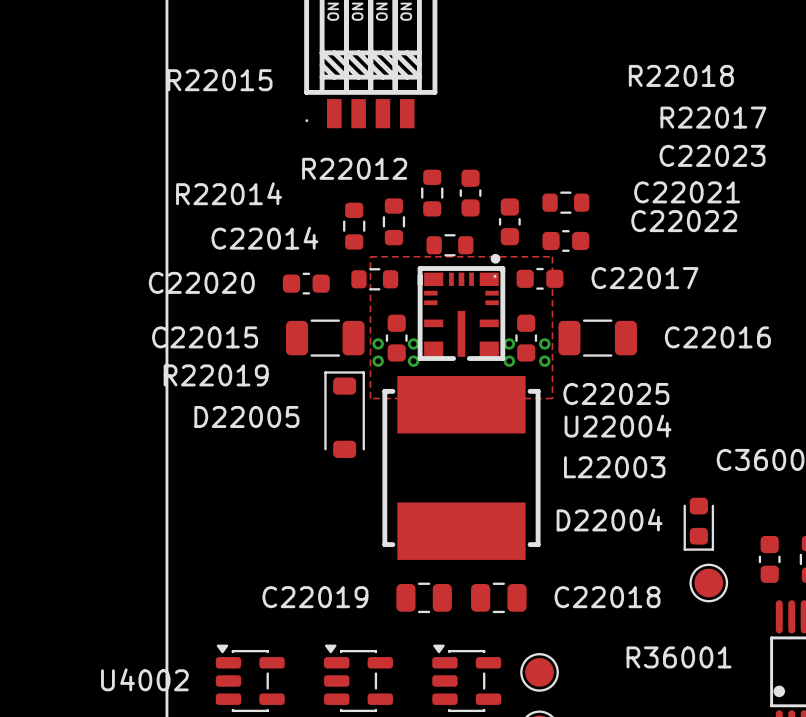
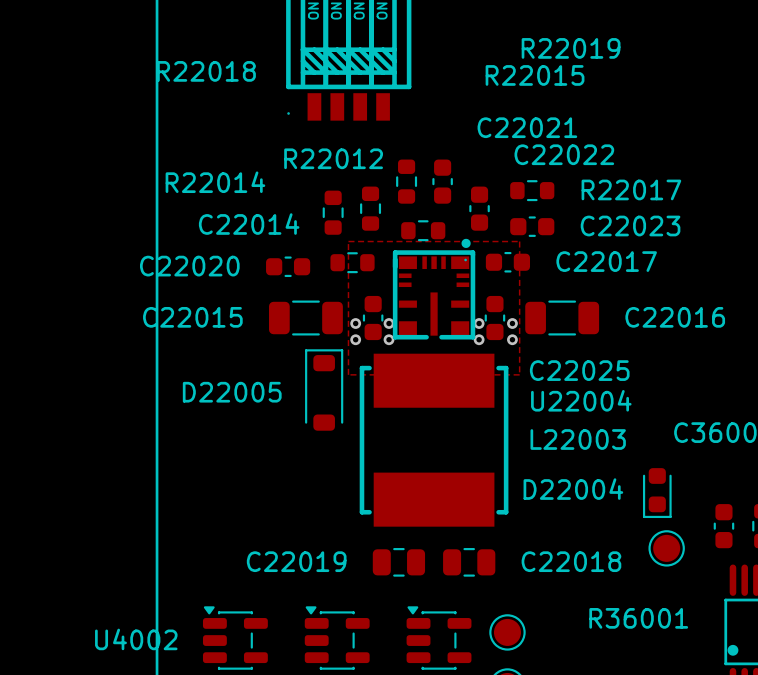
R22018 name position: R22018 (681, 75) -> R22018 (206, 71)
R22015 name position: R22015 (219, 80) -> R22015 (535, 75)
R22017 name position: R22017 (713, 117) -> R22017 (631, 189)
C22023 name position: C22023 (712, 155) -> C22023 (630, 225)
C22021 name position: C22021 (687, 192) -> C22021 (527, 127)
C22022 name position: C22022 (684, 221) -> C22022 (564, 154)
R22019 name position: R22019 (216, 375) -> R22019 (571, 48)

